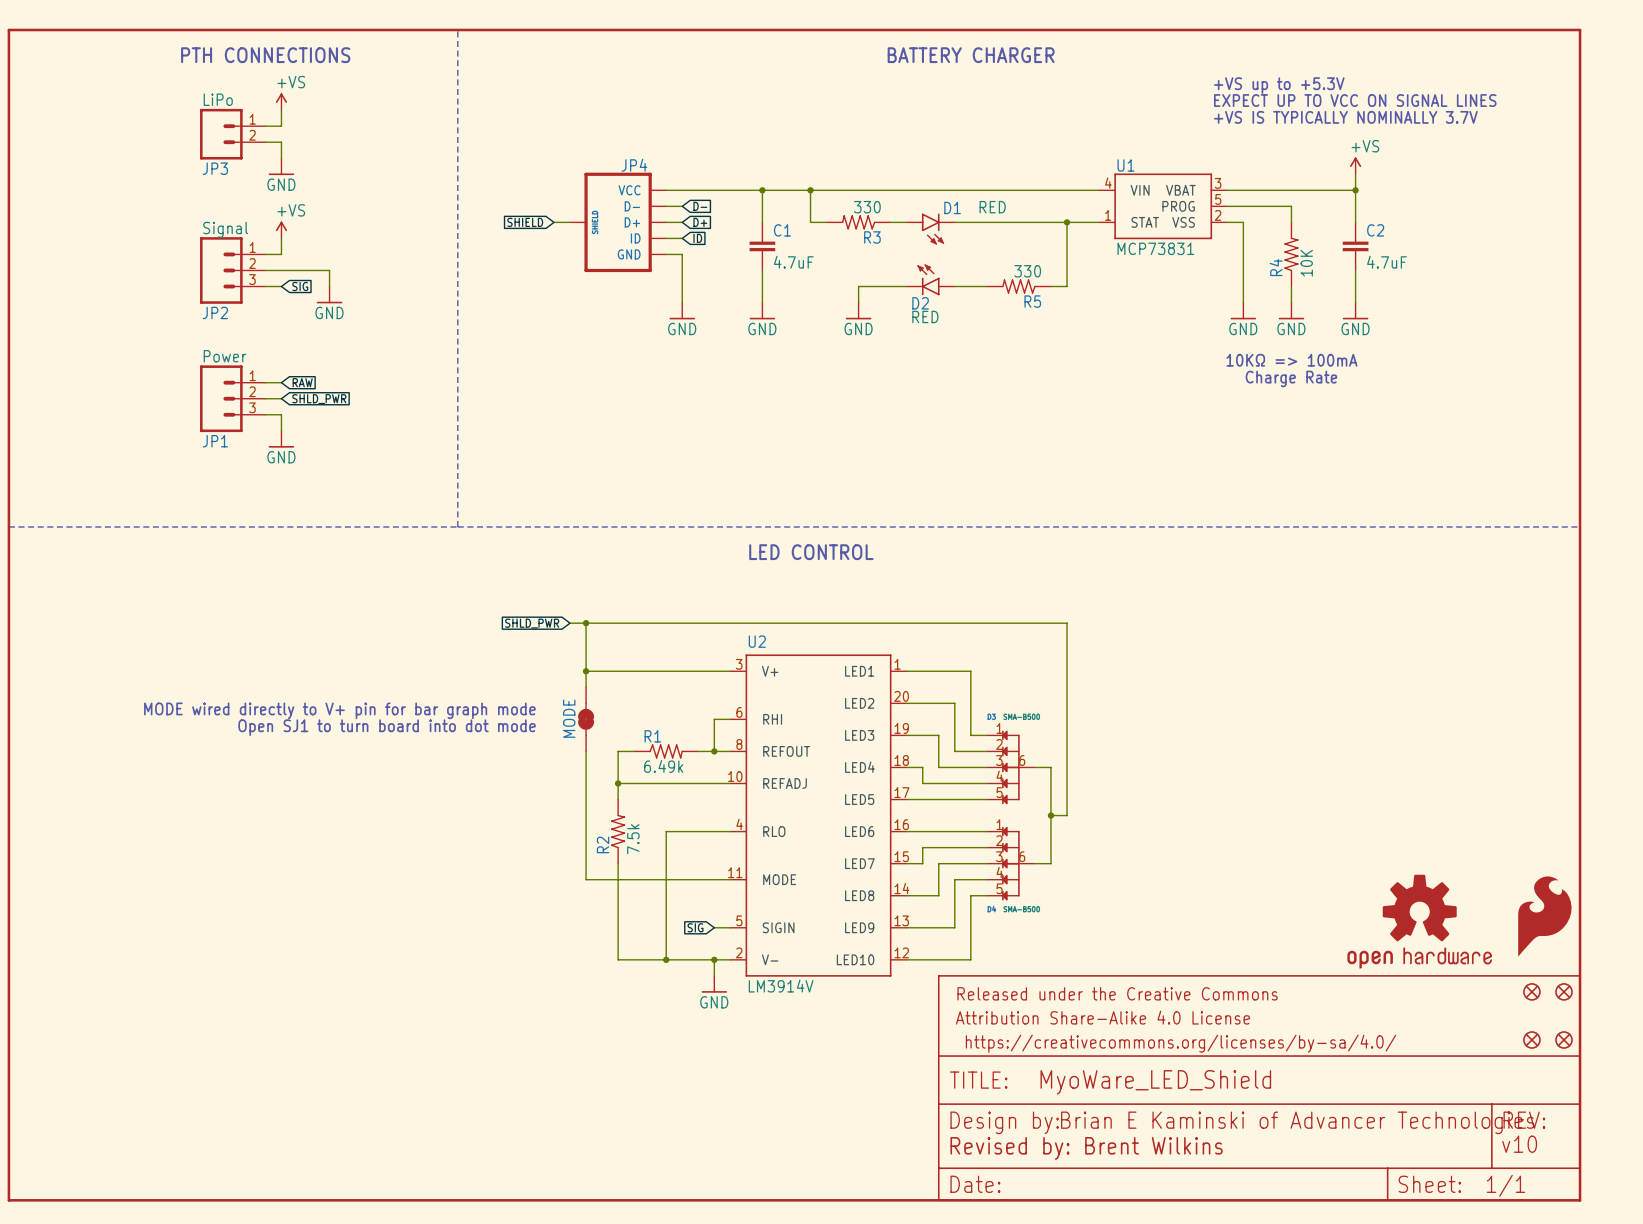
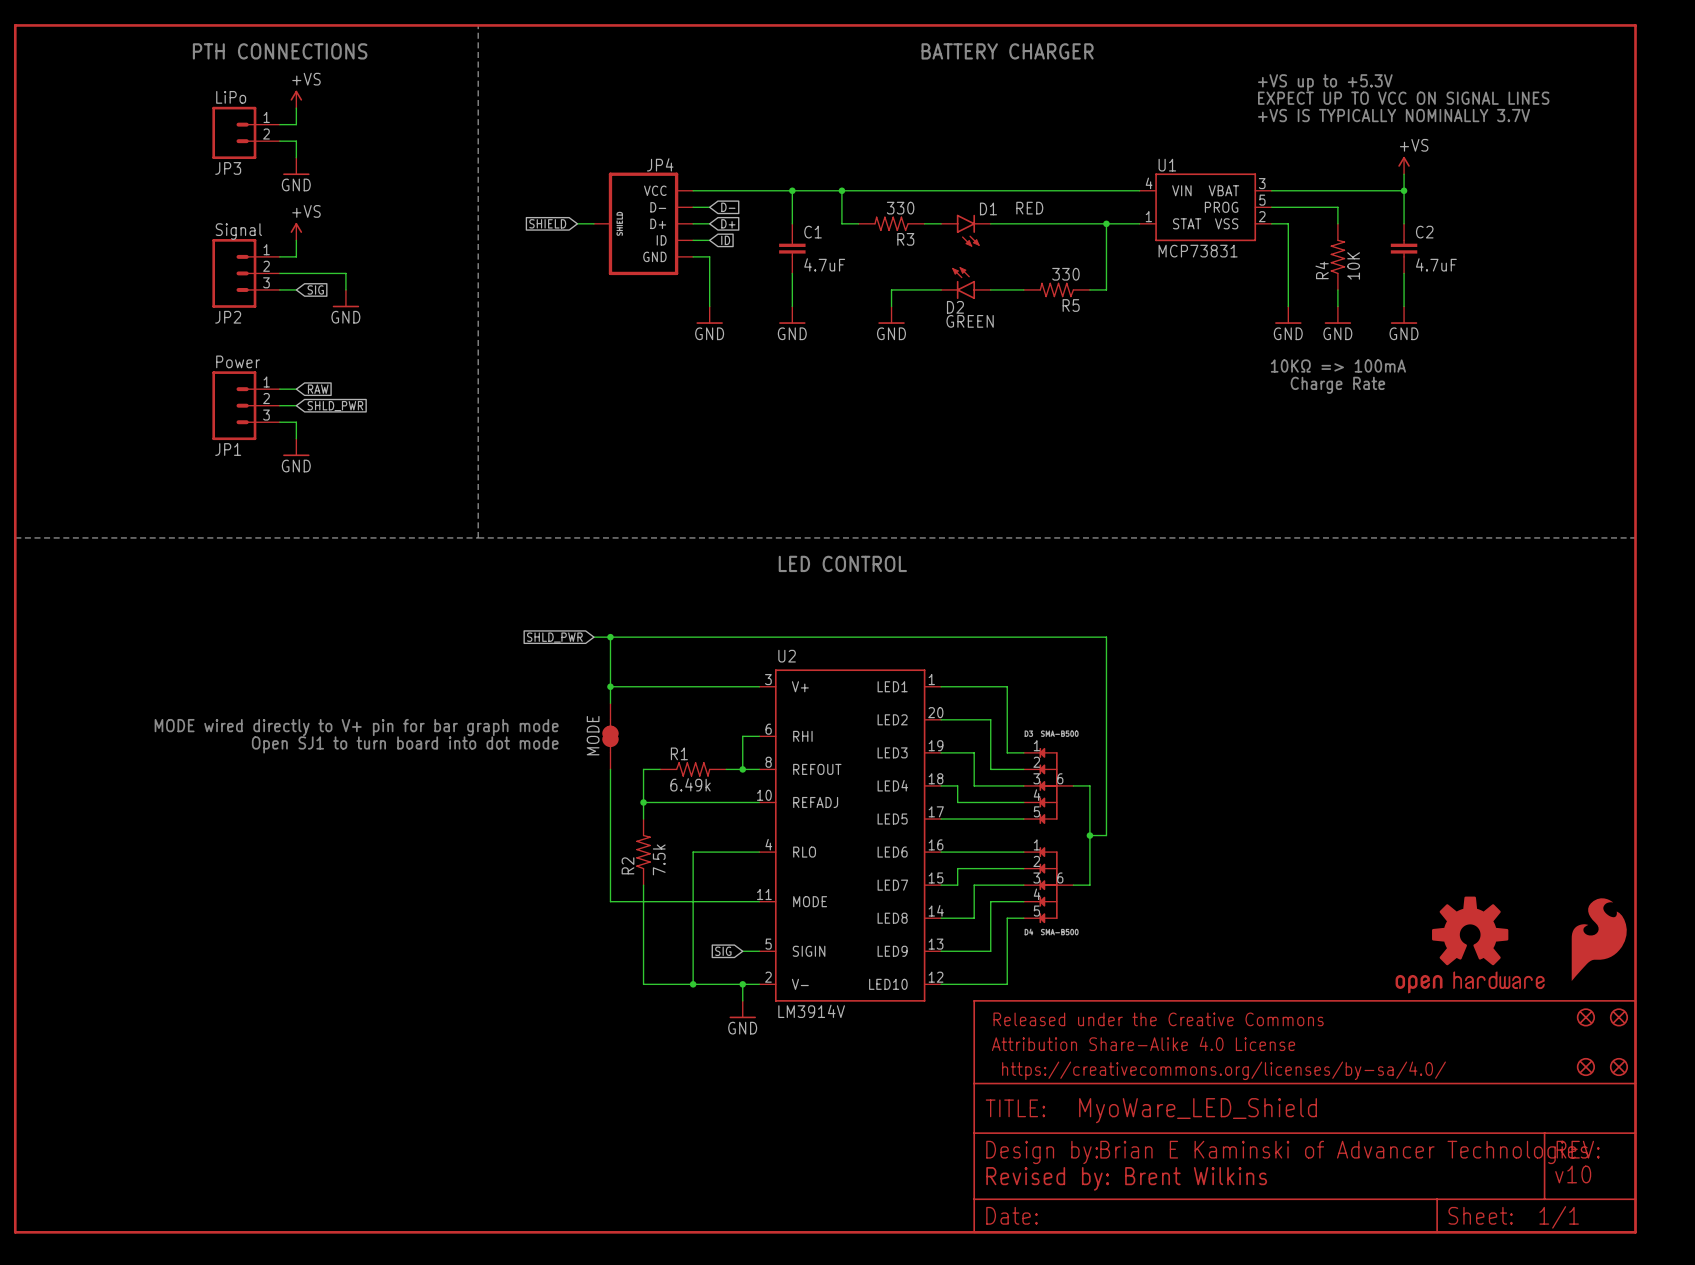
D2 value: RED (925, 316) -> GREEN (970, 321)

